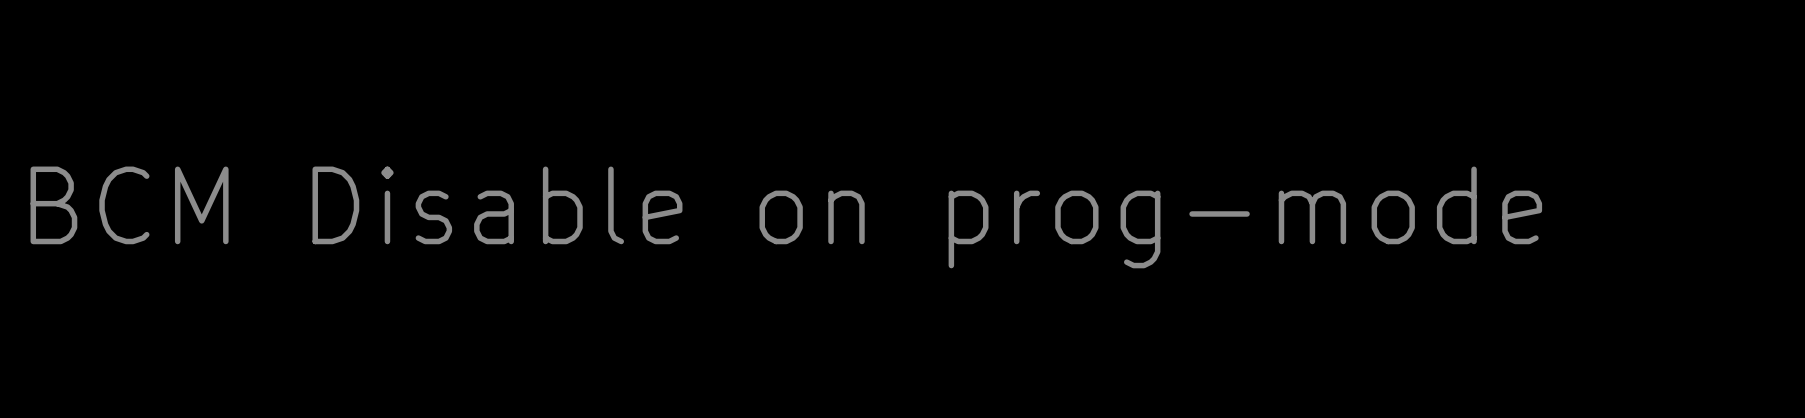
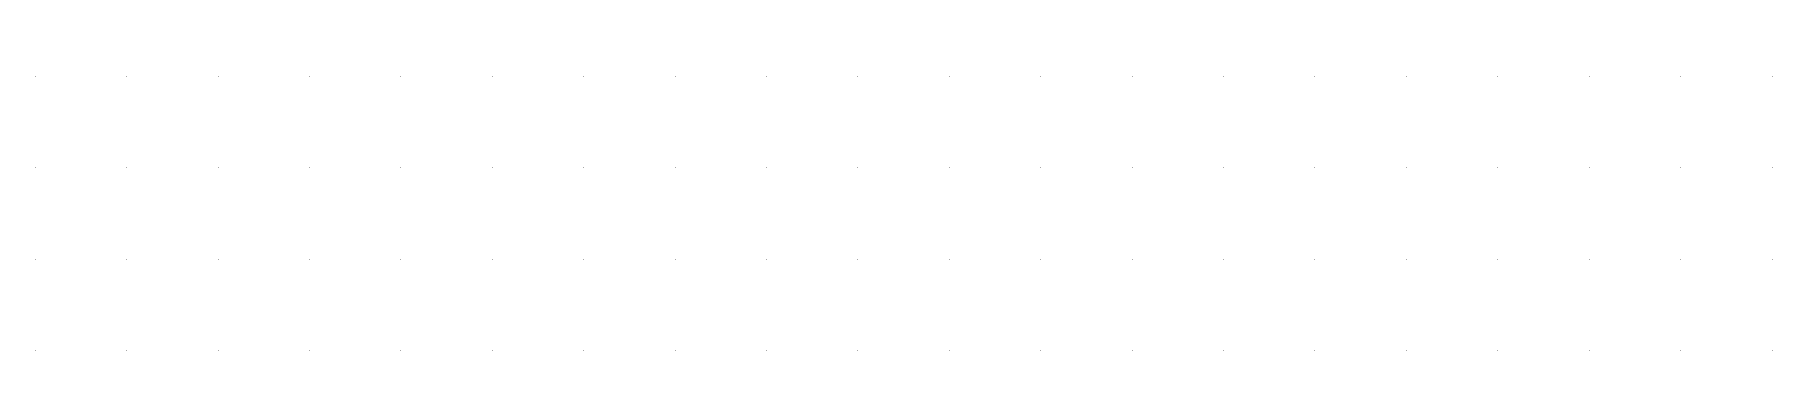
text: BCM Disable on prog-mode (786, 217) -> none

